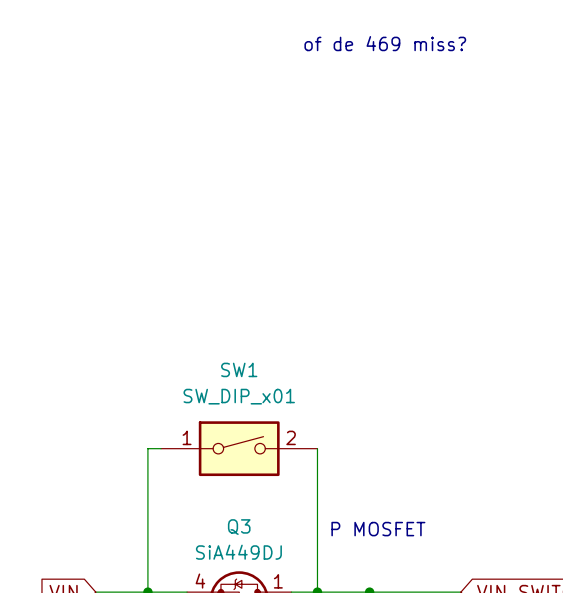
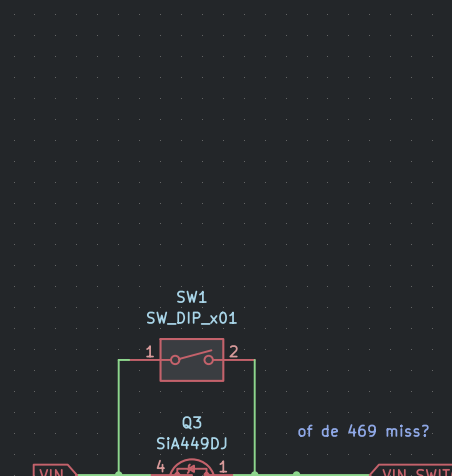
text: of de 469 miss? (385, 43) -> none
text: P MOSFET (378, 529) -> none
text: none -> of de 469 miss? (363, 430)

